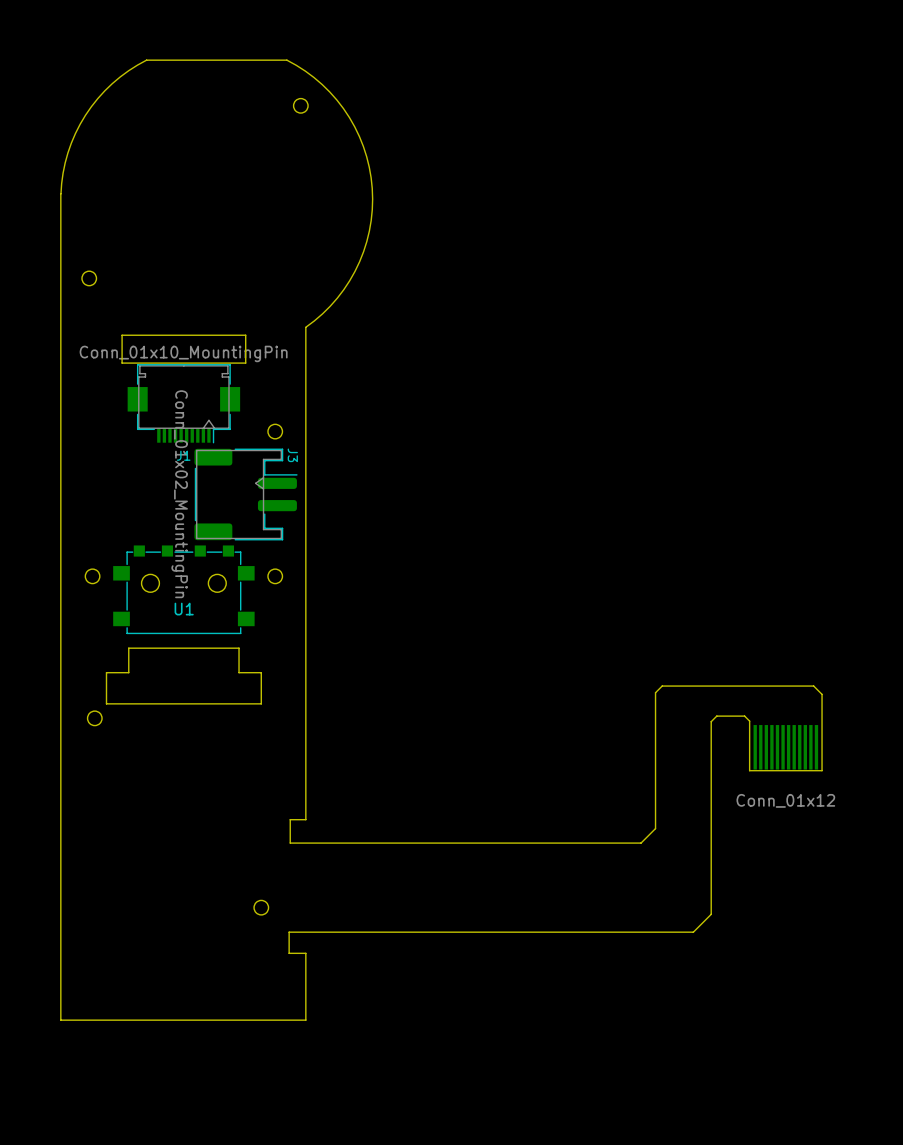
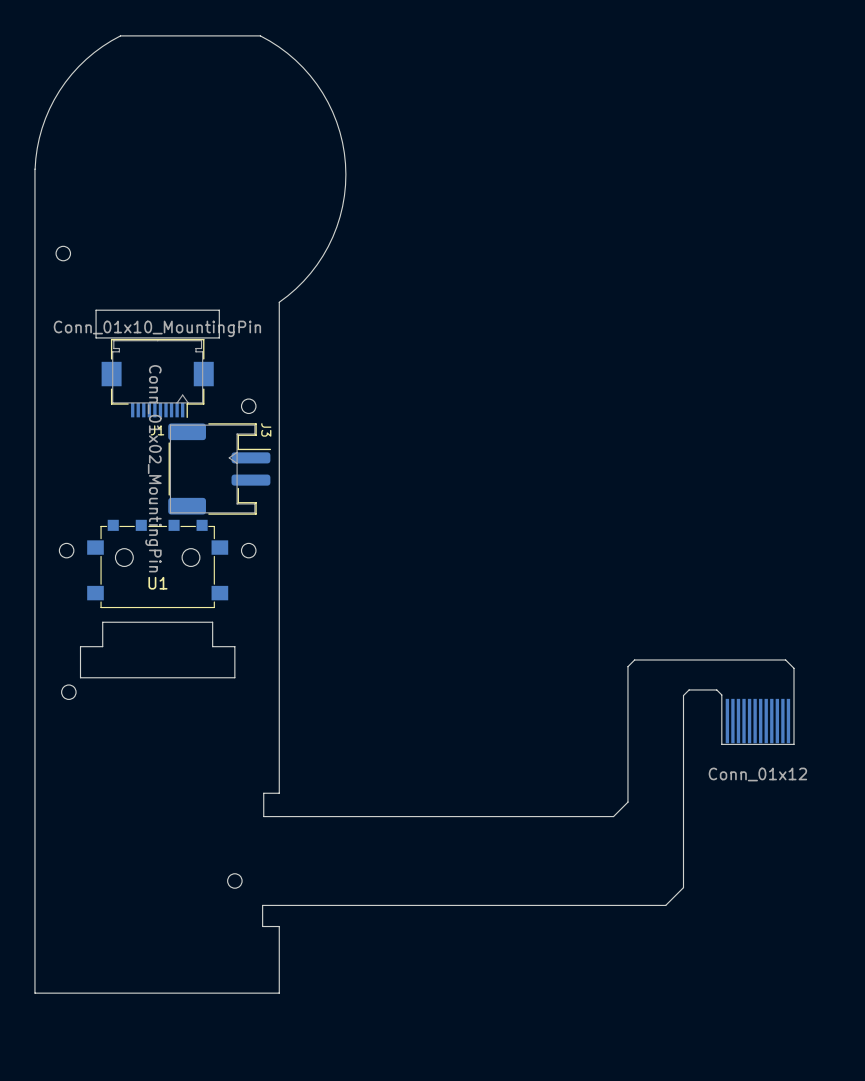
round board edge: [293, 98, 309, 114] -> none

